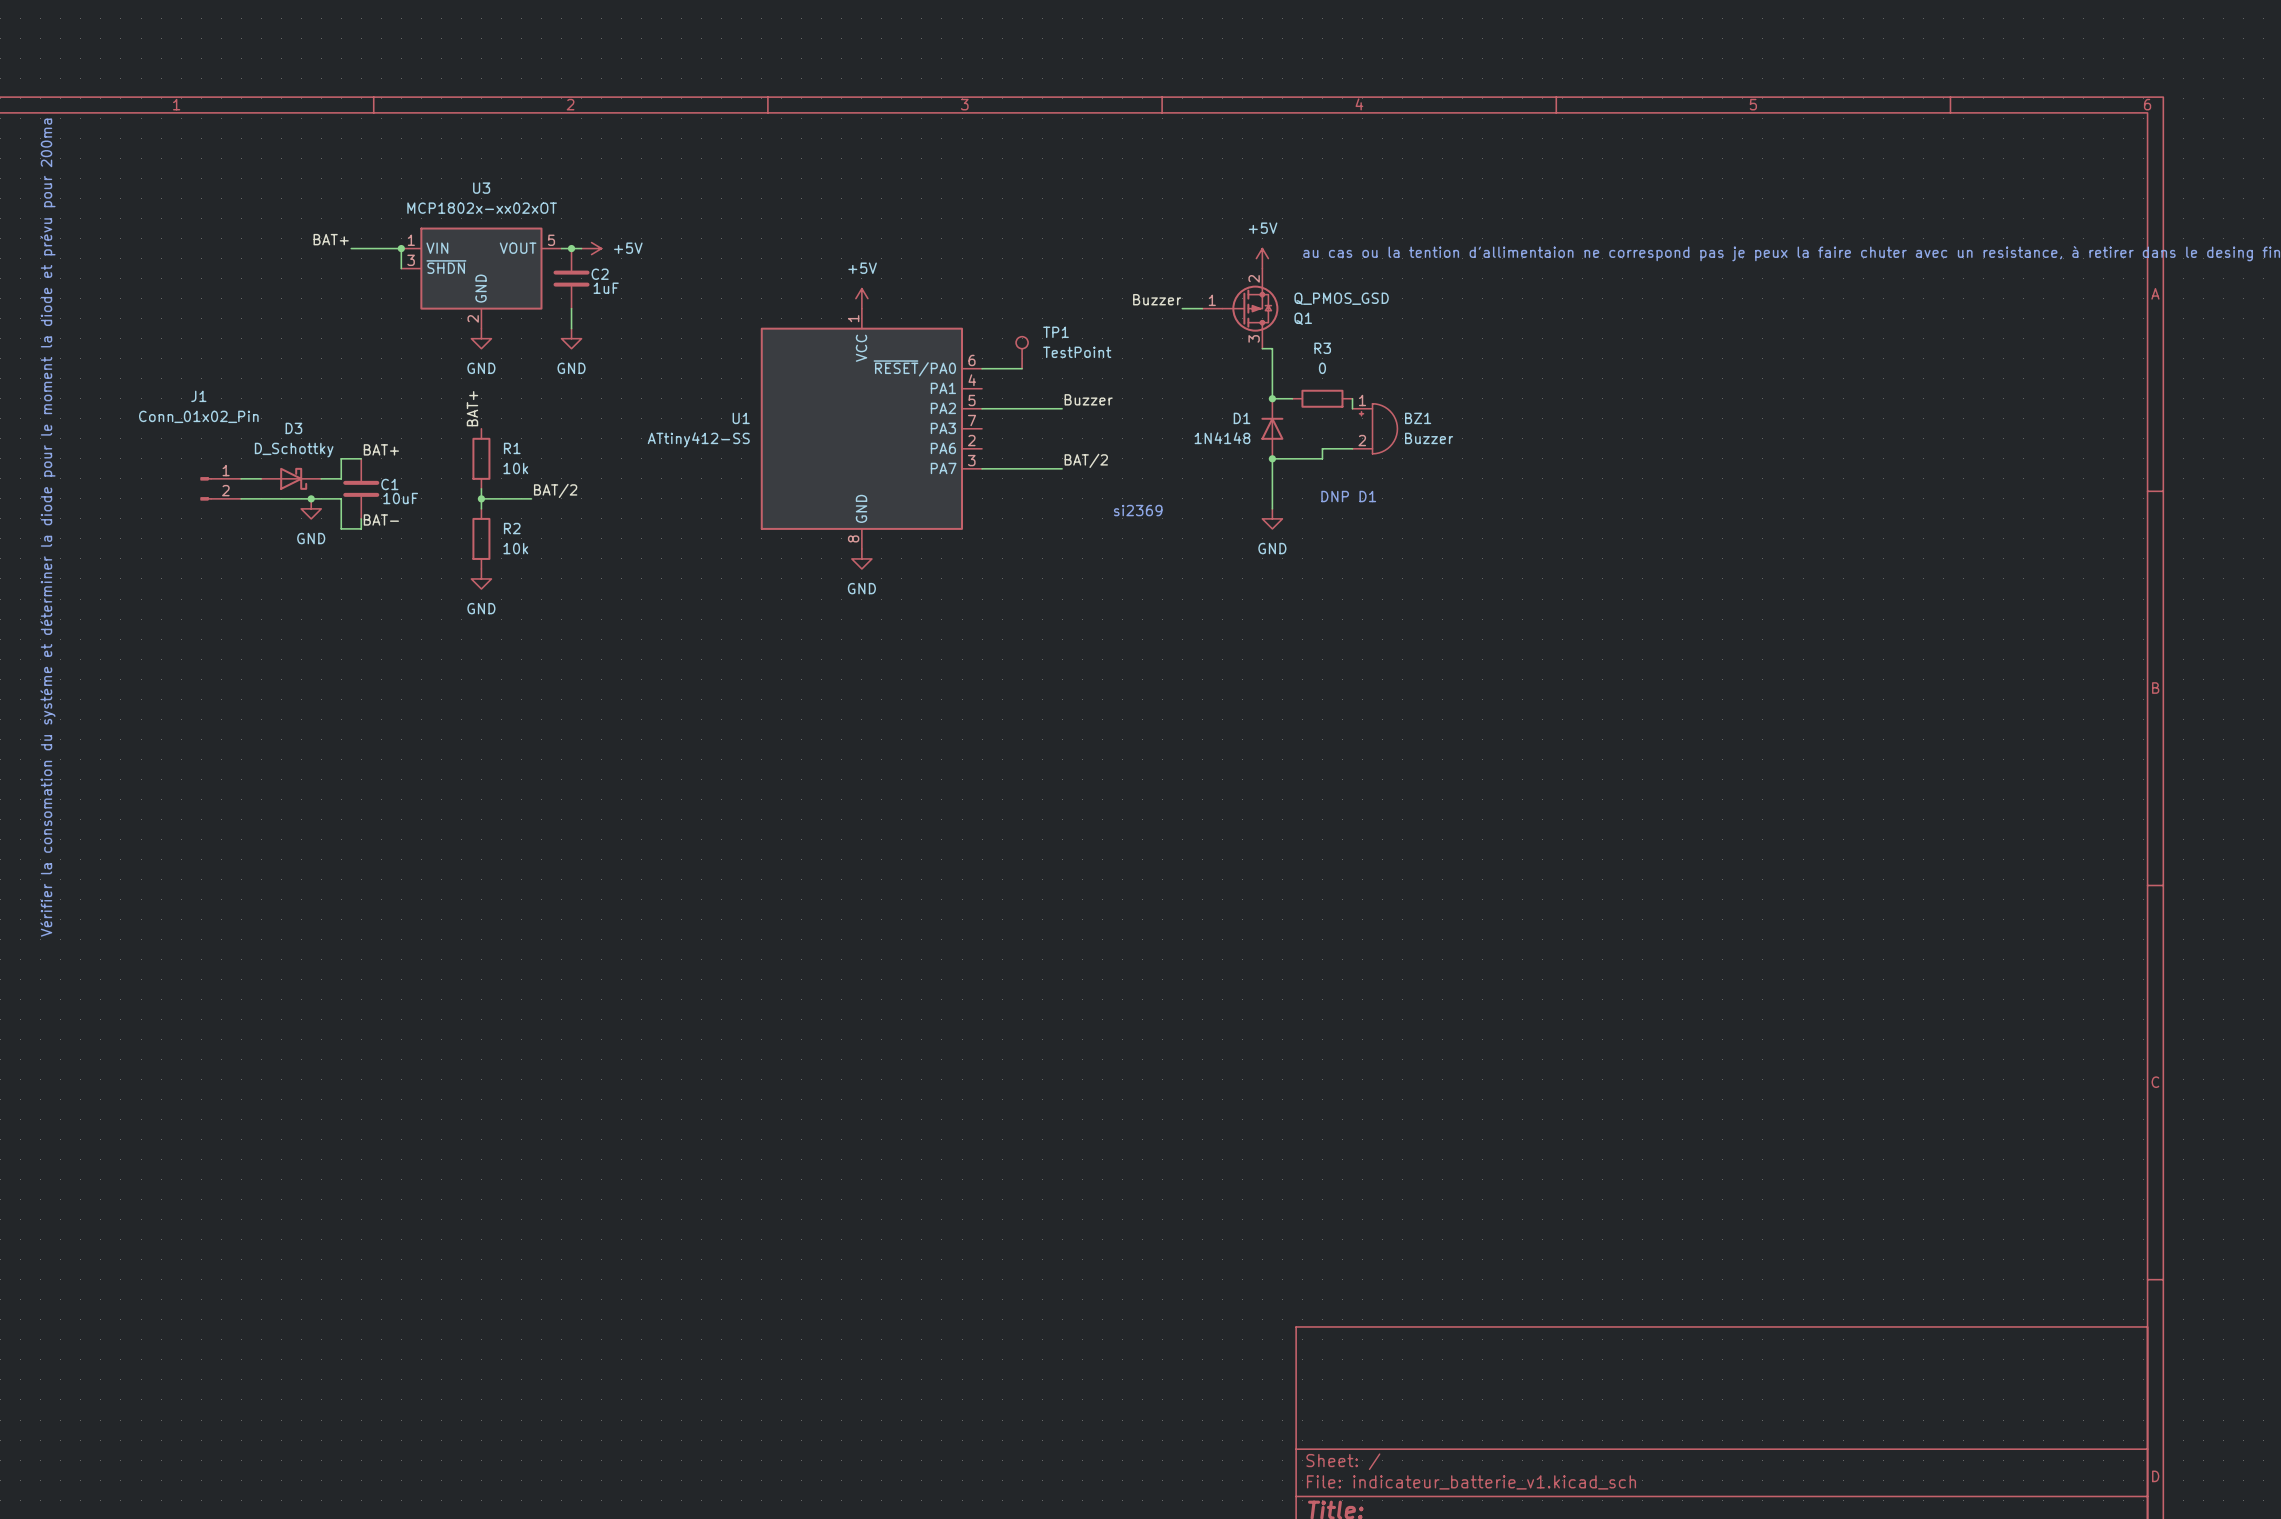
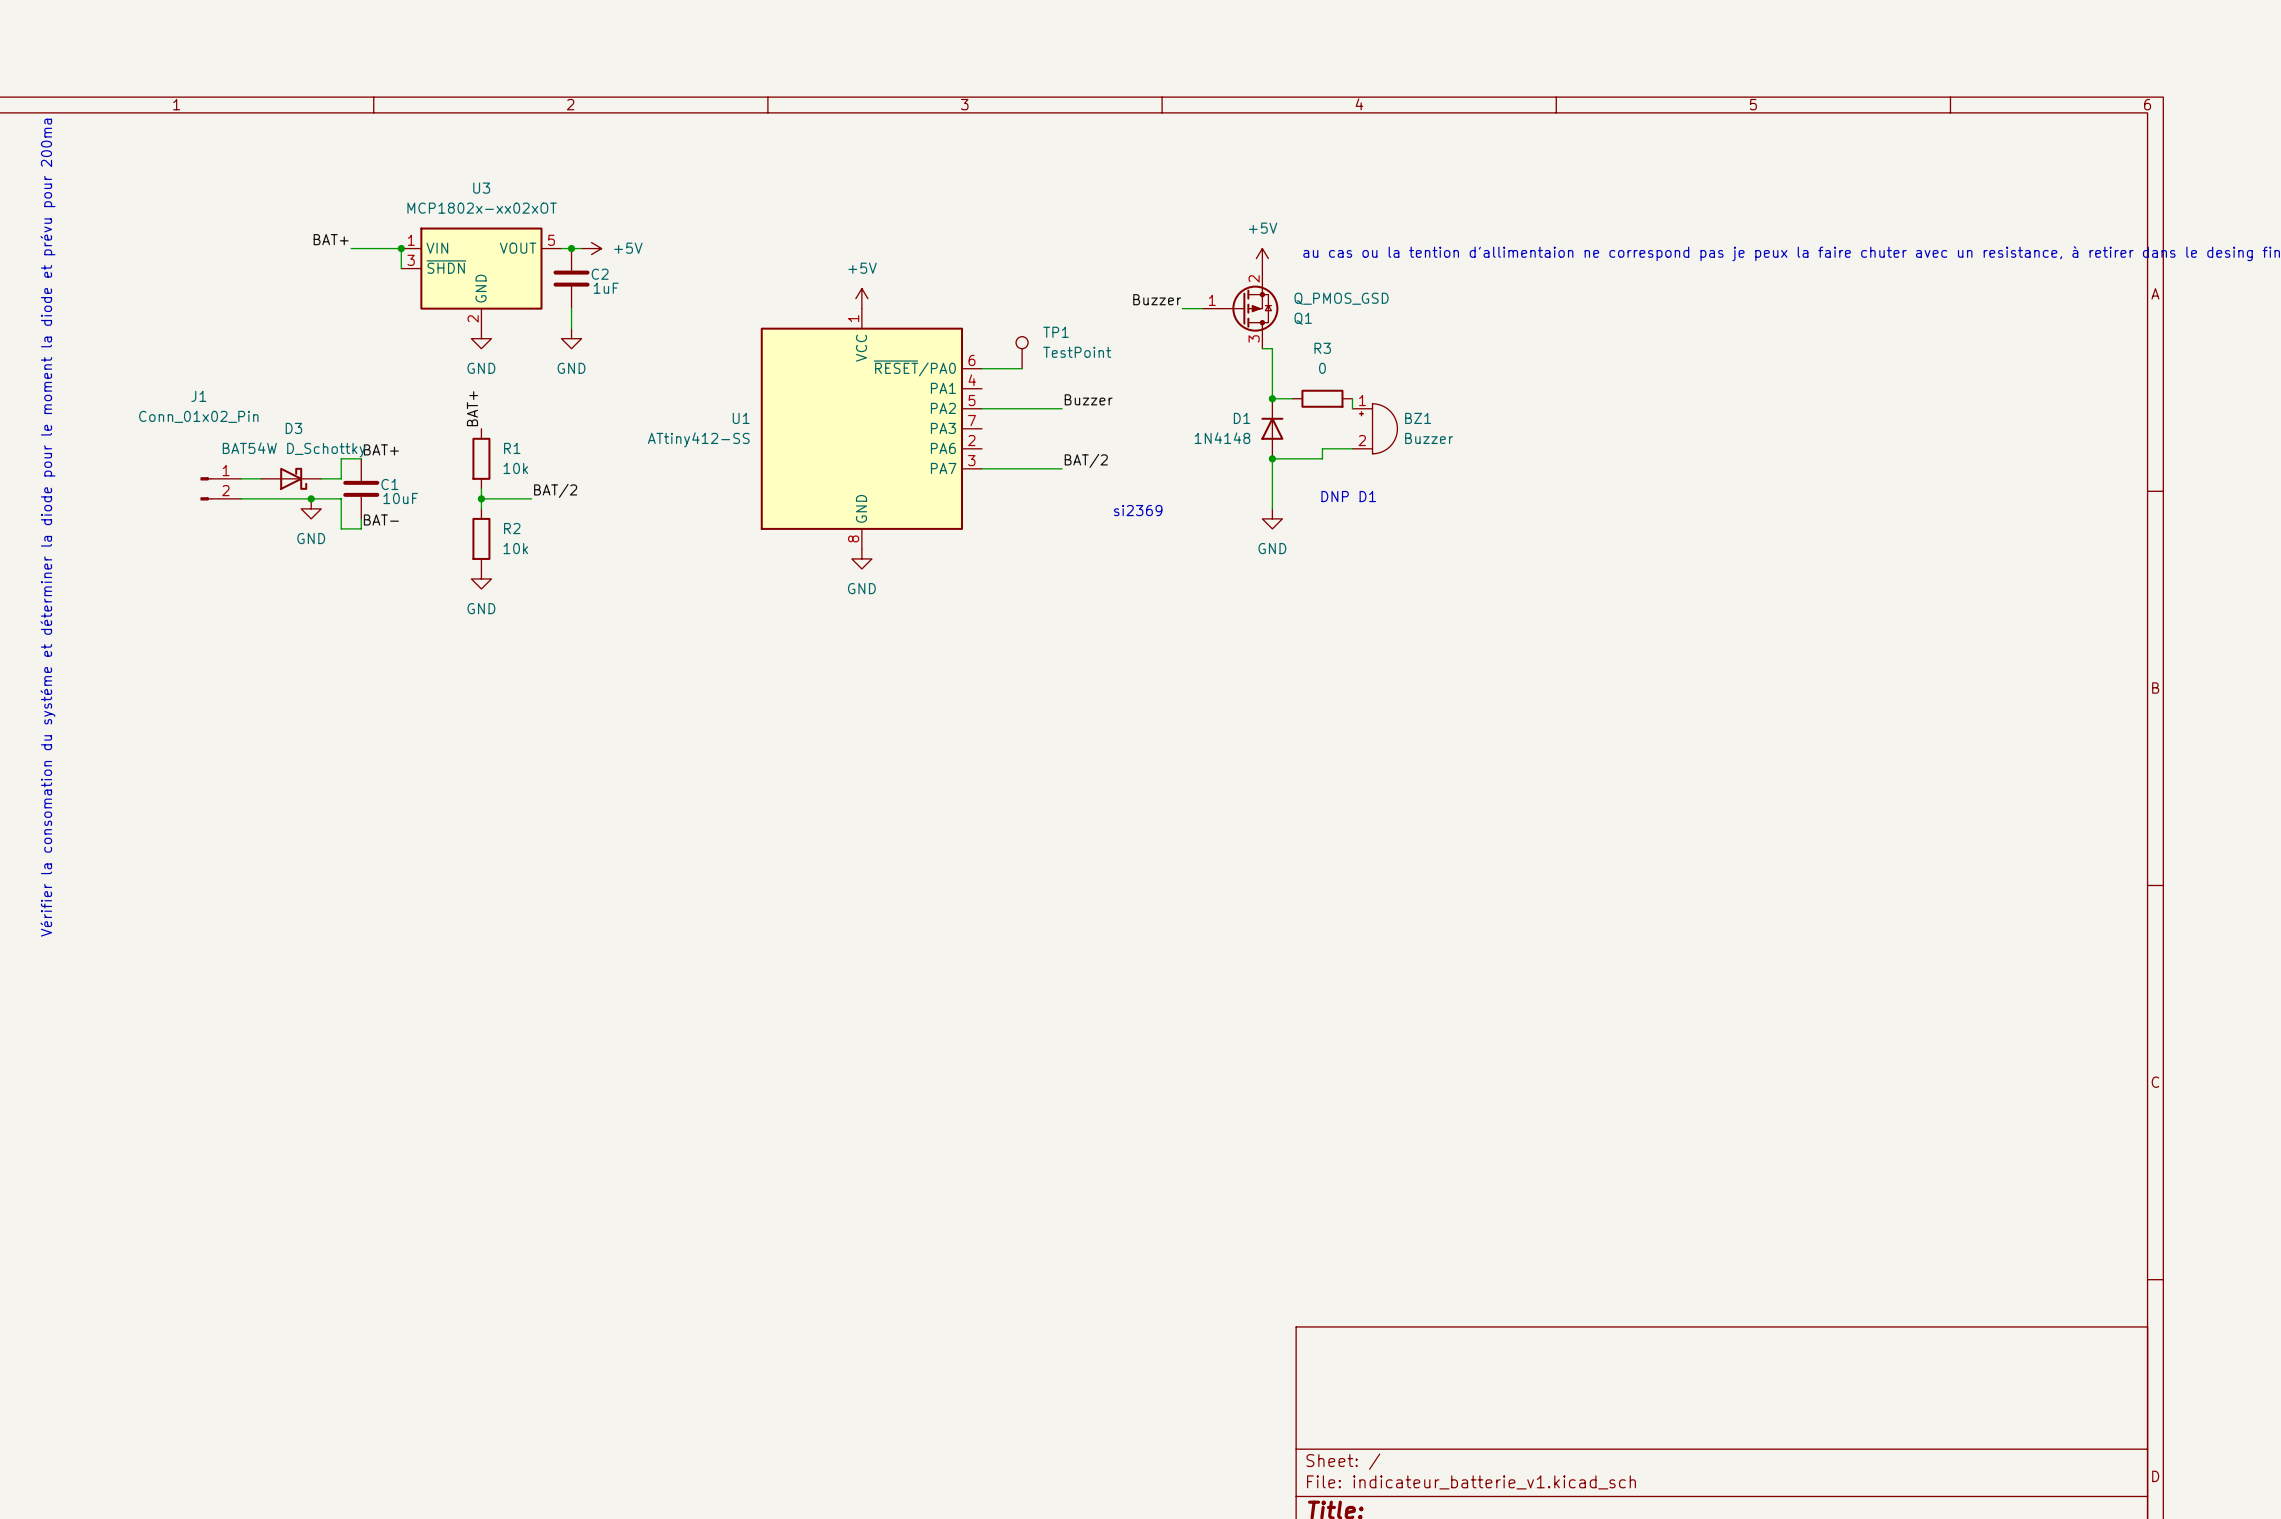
D3 value: D_Schottky (294, 450) -> BAT54W D_Schottky (294, 449)

